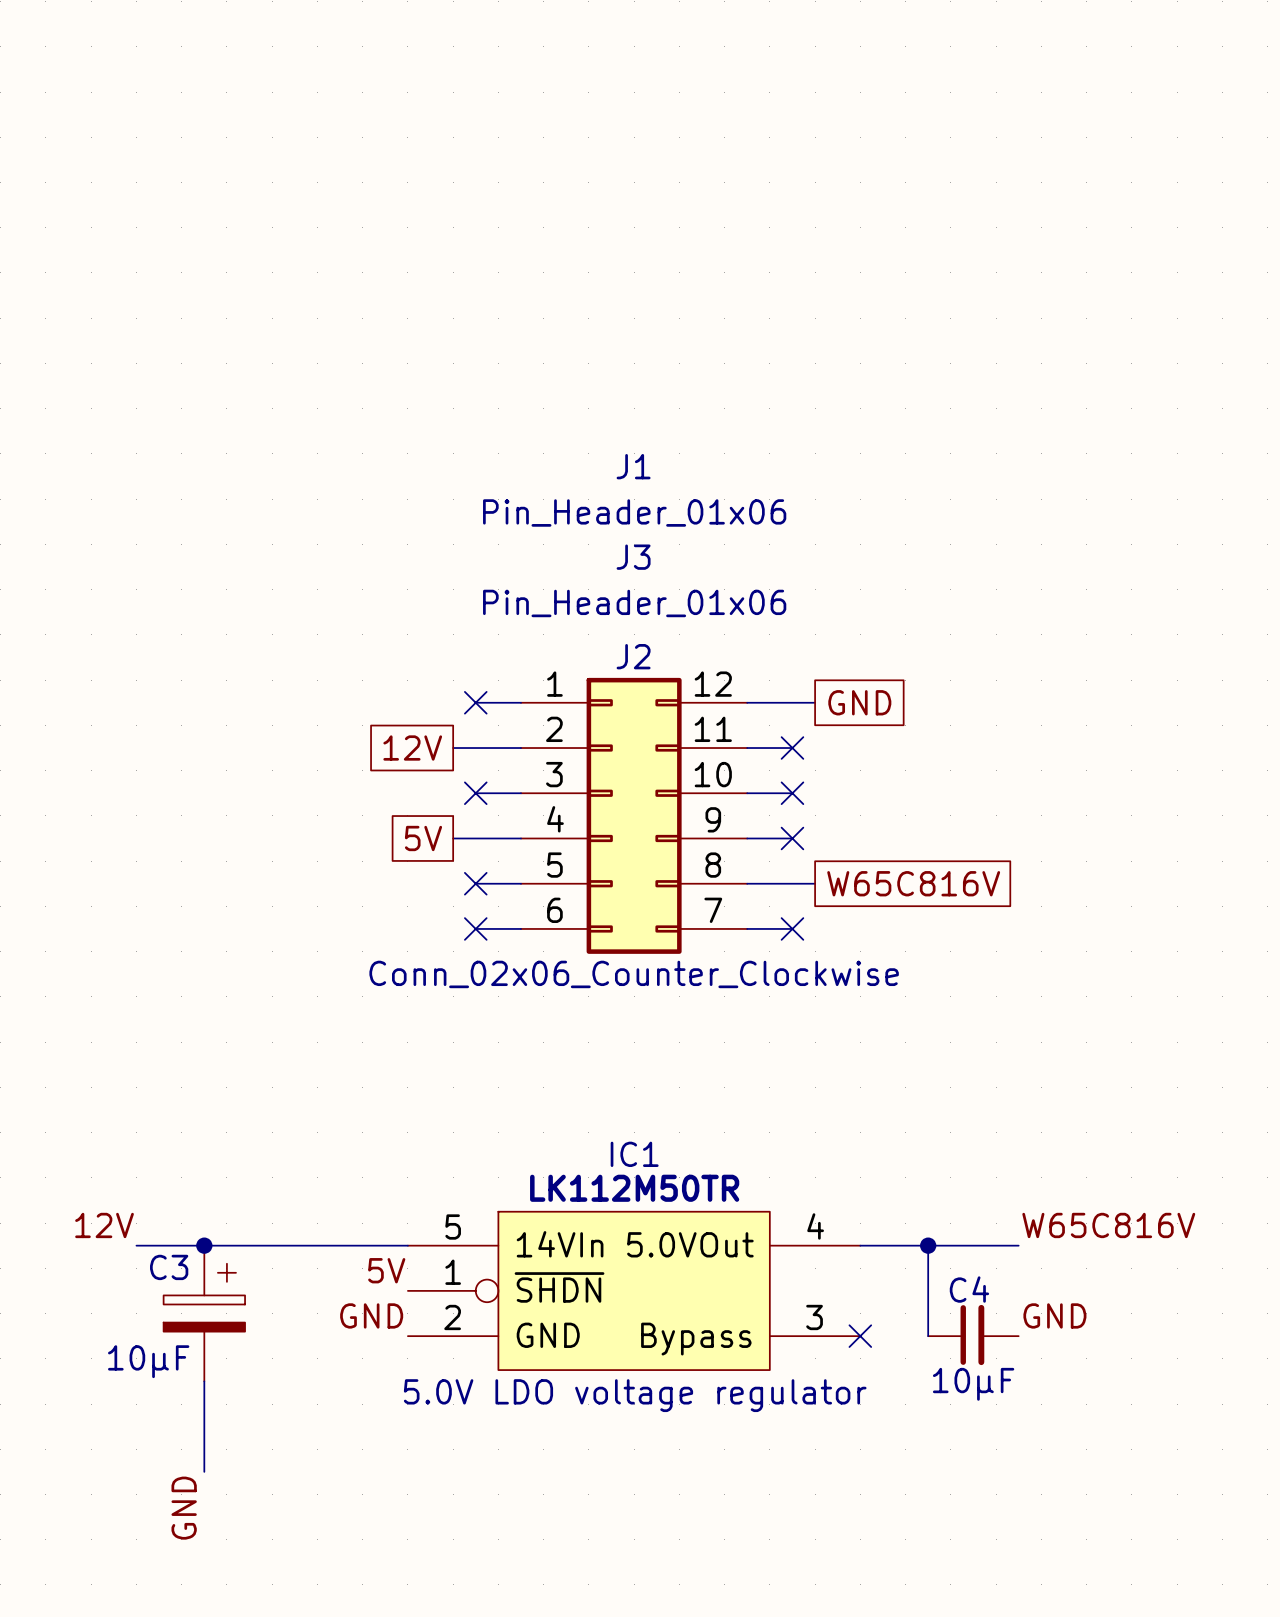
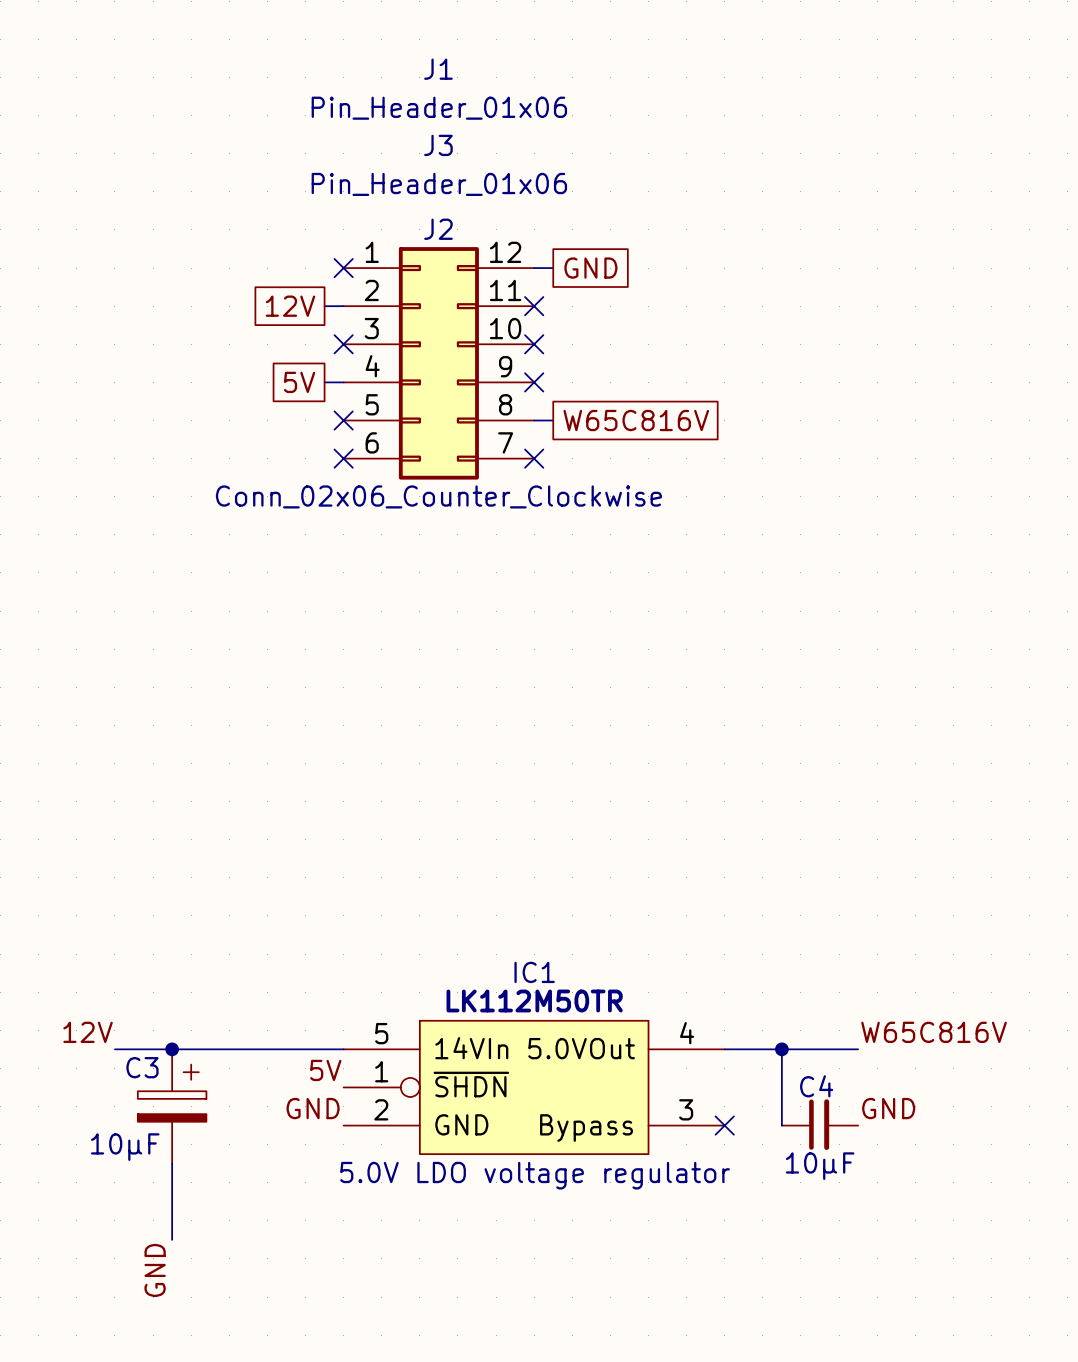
no-connect mark: none -> (343, 268)
wire: none -> (534, 268) (553, 268)
wire: none -> (324, 306) (343, 306)
no-connect mark: none -> (534, 306)
no-connect mark: none -> (343, 344)
no-connect mark: none -> (534, 344)
wire: none -> (324, 382) (343, 382)
no-connect mark: none -> (534, 382)
J1 position: (634, 490) -> (439, 89)
no-connect mark: none -> (343, 420)
wire: none -> (534, 420) (553, 420)
no-connect mark: none -> (343, 458)
no-connect mark: none -> (534, 458)
J3 position: (634, 580) -> (439, 165)
wire: (475, 702) (521, 702) -> none
no-connect mark: (475, 702) -> none
wire: (747, 702) (815, 702) -> none
global label position: GND (859, 702) -> GND (590, 268)
global label position: 12V (412, 748) -> 12V (290, 306)
wire: (453, 748) (521, 748) -> none
wire: (747, 748) (792, 748) -> none
no-connect mark: (792, 748) -> none
wire: (475, 793) (521, 793) -> none
no-connect mark: (475, 793) -> none
wire: (747, 793) (792, 793) -> none
no-connect mark: (792, 793) -> none
J2 position: (634, 815) -> (438, 363)
global label position: 5V (423, 838) -> 5V (299, 382)
wire: (453, 838) (521, 838) -> none
wire: (747, 838) (792, 838) -> none
no-connect mark: (792, 838) -> none
wire: (475, 883) (521, 883) -> none
no-connect mark: (475, 883) -> none
wire: (747, 883) (815, 883) -> none
global label position: W65C816V (913, 883) -> W65C816V (636, 420)
wire: (475, 928) (521, 928) -> none
no-connect mark: (475, 928) -> none
wire: (747, 928) (792, 928) -> none
no-connect mark: (792, 928) -> none

